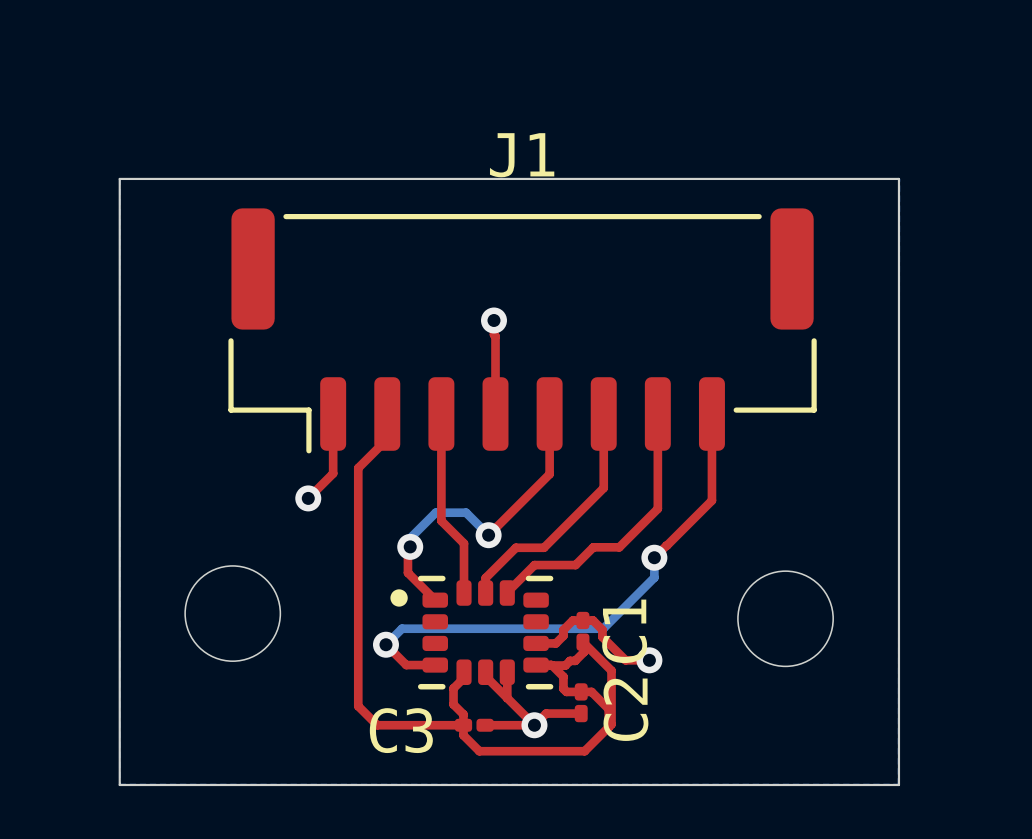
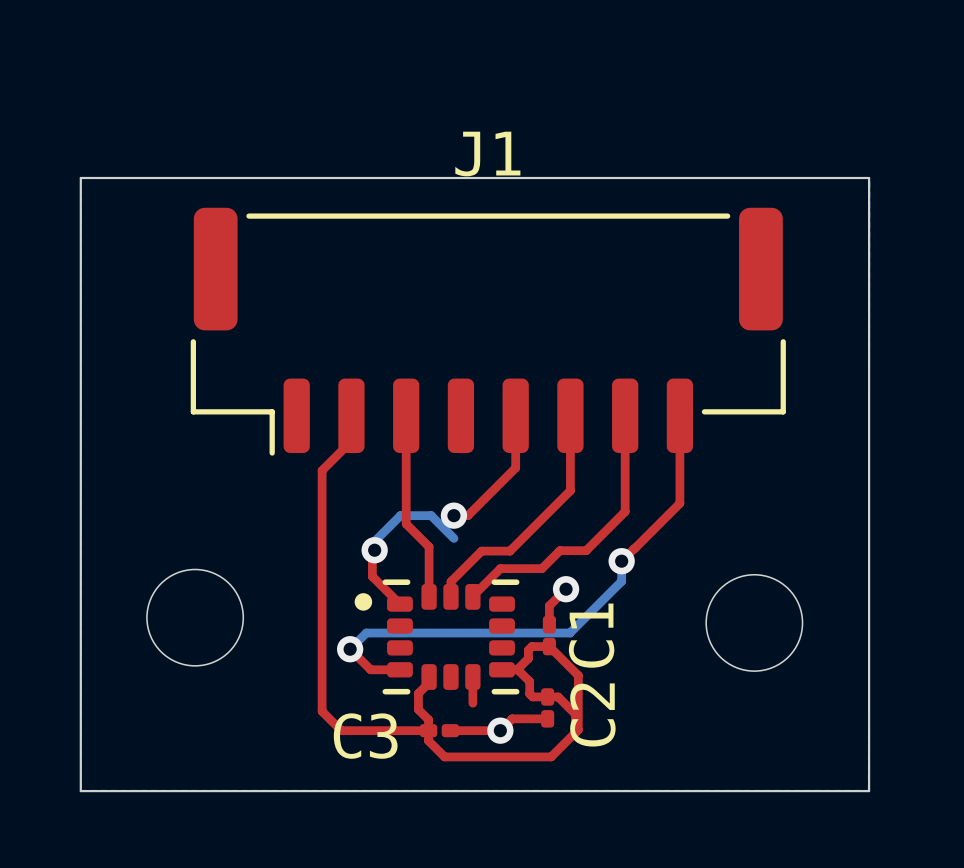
top track: (493, 320) (495, 414) -> none
via: (493, 320) -> none
top track: (333, 414) (333, 473) (308, 498) -> none
top track: (549, 465) (549, 474) (488, 535) -> (515, 467) (467, 515) (453, 515)
via: (308, 498) -> none
via position: (488, 535) -> (453, 515)
top track: none -> (566, 589) (549, 605) (549, 624)
via: none -> (566, 589)
top track: (536, 643) (555, 643) (563, 635) (563, 629) (572, 620) (593, 620) (602, 629) (602, 637) (625, 660) (649, 660) -> none
top track: (584, 643) (584, 652) (575, 660) (570, 660) (565, 665) (551, 665) -> (549, 646) (531, 646) (528, 650) (528, 658) (517, 669)
via: (649, 660) -> none
top track: (485, 672) (484, 675) (534, 725) -> none

